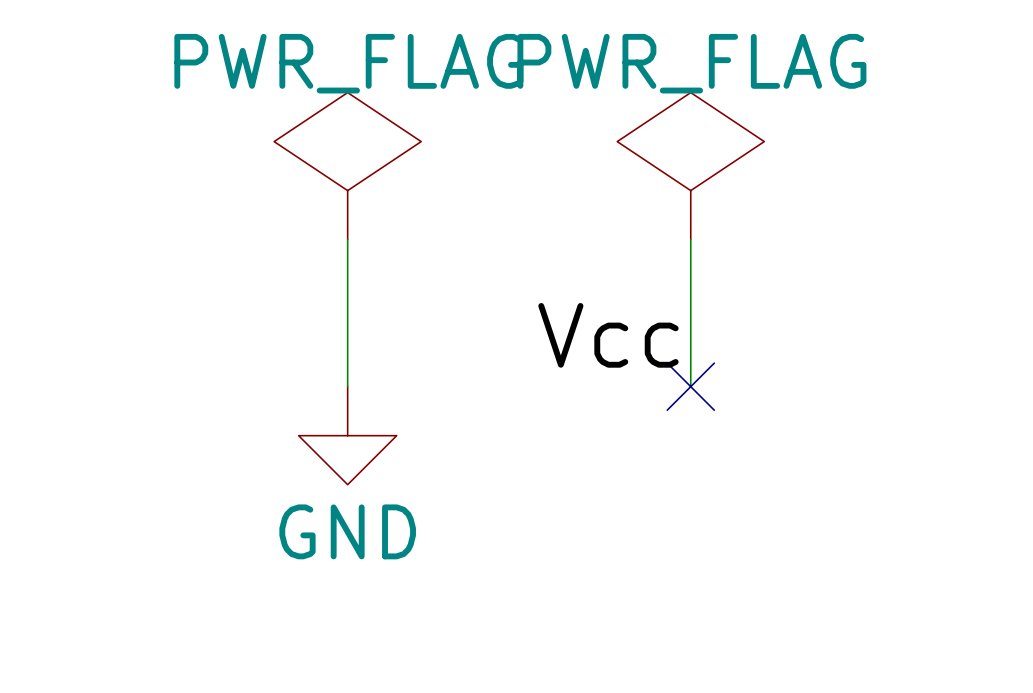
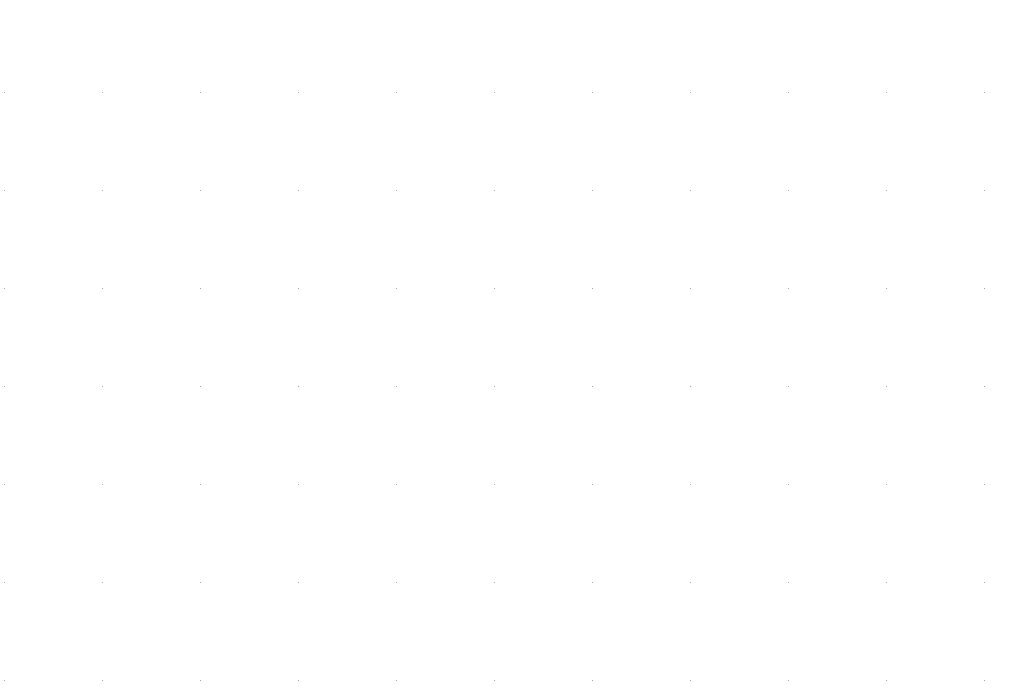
power symbol: PWR_FLAG (347, 166) -> none
power symbol: PWR_FLAG (690, 166) -> none
wire: (347, 239) (347, 386) -> none
wire: (690, 239) (690, 386) -> none
label: Vcc (608, 335) -> none
no-connect mark: (690, 386) -> none
power symbol: GND (347, 435) -> none

